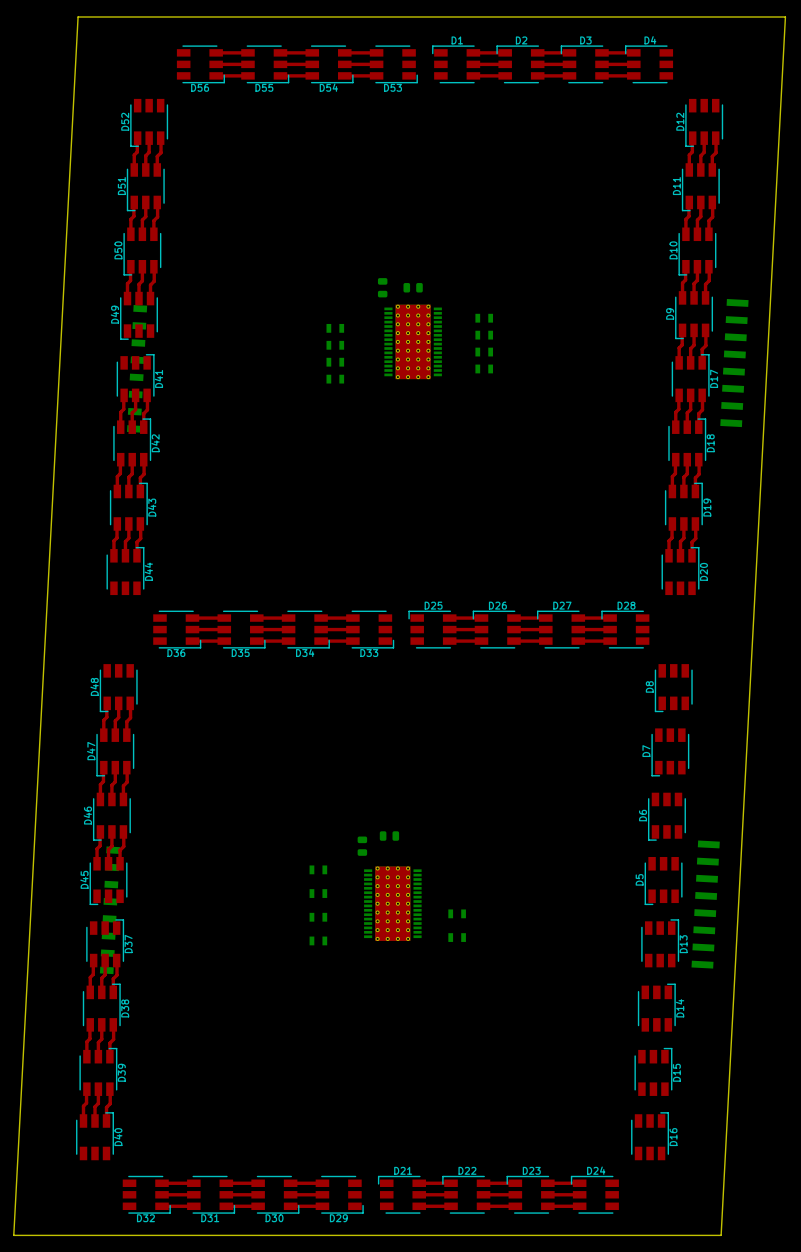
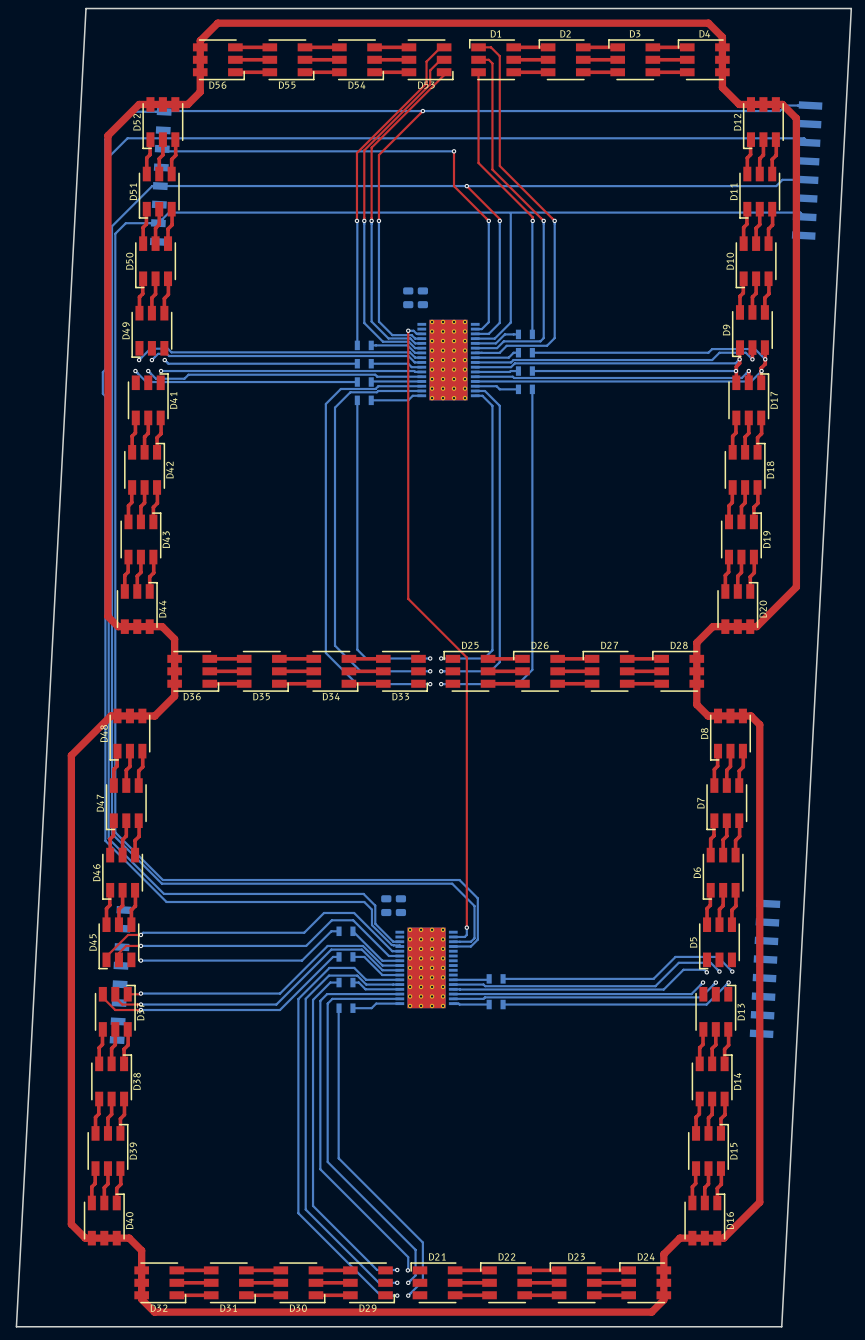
top track: none -> (217, 23) (708, 23) (722, 37) (722, 87) (739, 104) (782, 104) (796, 118) (796, 587) (756, 626) (712, 626) (696, 642) (696, 704) (708, 715) (750, 715) (759, 724) (759, 1202) (723, 1238) (679, 1238) (663, 1254) (663, 1300) (651, 1312) (154, 1312) (141, 1299) (141, 1250) (129, 1238) (85, 1238) (71, 1224) (71, 755) (110, 715) (154, 715) (174, 696) (174, 639) (162, 626) (118, 626) (107, 616) (107, 135) (139, 104) (187, 104) (200, 92) (200, 40) (217, 23)
top track: none -> (444, 47) (440, 47) (426, 61) (426, 83) (356, 153) (356, 220)
top track: none -> (478, 47) (490, 47) (499, 56) (499, 165) (554, 220)
top track: none -> (444, 59) (440, 59) (430, 70) (430, 84) (364, 150) (364, 220)
top track: none -> (478, 59) (488, 59) (492, 63) (492, 169) (543, 220)
top track: none -> (444, 72) (444, 75) (371, 147) (371, 220)
top track: none -> (478, 72) (478, 163) (532, 217) (532, 220)
bottom track: none -> (810, 105) (785, 105) (779, 111) (132, 111) (105, 139) (105, 369) (102, 372) (102, 393) (105, 396) (105, 840) (166, 901) (364, 901) (371, 909) (371, 925) (391, 945) (399, 946)
top track: none -> (422, 111) (378, 154) (378, 220)
via: none -> (422, 111)
bottom track: none -> (808, 142) (804, 138) (127, 138) (108, 157) (108, 838) (163, 893) (363, 893) (375, 905) (375, 923) (393, 941) (399, 941)
bottom track: none -> (162, 148) (164, 151) (454, 151)
top track: none -> (454, 151) (454, 186) (488, 220)
via: none -> (454, 151)
part: none -> (807, 170)
part: none -> (160, 176)
bottom track: none -> (806, 179) (782, 179) (776, 186) (466, 186)
top track: none -> (466, 186) (499, 220)
bottom track: none -> (466, 186) (152, 186) (112, 226) (112, 833) (161, 883) (452, 883) (474, 906) (474, 938) (471, 941) (453, 941)
via: none -> (466, 186)
bottom track: none -> (510, 213) (510, 322) (494, 338) (475, 338)
bottom track: none -> (804, 216) (800, 212) (168, 212) (158, 223) (125, 223) (115, 233) (115, 832) (162, 880) (459, 880) (477, 898) (477, 939) (470, 946) (453, 946)
bottom track: none -> (356, 220) (357, 345)
via: none -> (356, 220)
bottom track: none -> (364, 220) (364, 323) (383, 341) (408, 341) (415, 348) (421, 348)
via: none -> (364, 220)
bottom track: none -> (371, 220) (371, 321) (388, 338) (410, 338) (415, 343) (421, 343)
via: none -> (371, 220)
bottom track: none -> (378, 220) (378, 321) (392, 335) (411, 335) (415, 338) (421, 338)
via: none -> (378, 220)
bottom track: none -> (488, 220) (488, 322) (481, 329) (475, 329)
via: none -> (488, 220)
bottom track: none -> (499, 220) (499, 322) (488, 333) (475, 333)
via: none -> (499, 220)
bottom track: none -> (532, 220) (532, 334)
via: none -> (532, 220)
bottom track: none -> (543, 220) (543, 338) (540, 341) (503, 341) (497, 348) (475, 348)
via: none -> (543, 220)
bottom track: none -> (554, 220) (554, 338) (547, 345) (506, 345) (499, 352) (475, 352)
via: none -> (554, 220)
part: none -> (408, 297)
part: none -> (422, 297)
part: (382, 287) -> none
part: (413, 287) -> none
top track: none -> (408, 330) (408, 598) (466, 657) (466, 927)
bottom track: none -> (408, 330) (421, 333)
via: none -> (408, 330)
bottom track: none -> (518, 334) (504, 334) (495, 343) (475, 343)
bottom track: none -> (371, 345) (407, 345) (415, 352) (421, 352)
bottom track: none -> (518, 352) (513, 352) (508, 357) (475, 357)
bottom track: none -> (532, 352) (708, 352) (712, 349) (755, 349) (765, 359)
bottom track: none -> (421, 357) (415, 357) (409, 352) (171, 352) (167, 348) (150, 348) (139, 360)
via: none -> (139, 360)
bottom track: none -> (151, 360) (158, 353) (166, 353) (169, 356) (408, 356) (414, 362) (421, 362)
via: none -> (151, 360)
bottom track: none -> (164, 360) (168, 363) (357, 363)
via: none -> (164, 360)
bottom track: none -> (739, 359) (735, 363) (514, 363) (511, 367) (475, 367)
via: none -> (739, 359)
top track: (694, 341) (690, 352) -> none
bottom track: none -> (752, 359) (745, 352) (719, 352) (712, 360) (513, 360) (511, 362) (475, 362)
via: none -> (752, 359)
via: none -> (765, 359)
bottom track: none -> (371, 363) (408, 363) (411, 367) (421, 367)
bottom track: none -> (135, 371) (146, 382) (357, 382)
via: none -> (135, 371)
bottom track: none -> (148, 371) (155, 378) (184, 378) (188, 374) (375, 374) (377, 376) (421, 376)
via: none -> (148, 371)
bottom track: none -> (161, 371) (421, 371)
via: none -> (161, 371)
bottom track: none -> (518, 371) (475, 371)
bottom track: none -> (532, 371) (735, 371)
via: none -> (735, 371)
bottom track: none -> (748, 371) (741, 377) (475, 376)
via: none -> (748, 371)
bottom track: none -> (761, 371) (751, 381) (475, 381)
via: none -> (761, 371)
bottom track: none -> (421, 381) (371, 382)
part: (734, 363) -> none
bottom track: none -> (421, 386) (340, 388) (325, 403) (325, 652) (356, 684) (430, 684)
bottom track: none -> (475, 386) (496, 386) (499, 389) (518, 389)
part: (137, 368) -> none
bottom track: none -> (532, 389) (532, 669) (518, 684) (441, 684)
bottom track: none -> (421, 390) (350, 392) (335, 407) (335, 645) (360, 671) (430, 671)
bottom track: none -> (475, 390) (484, 390) (499, 405) (499, 662) (490, 671) (441, 671)
bottom track: none -> (421, 395) (412, 395) (408, 400) (371, 400)
bottom track: none -> (475, 395) (482, 395) (492, 405) (492, 650) (484, 658) (441, 658)
bottom track: none -> (357, 400) (357, 649) (366, 658) (430, 658)
via: none -> (430, 658)
via: none -> (441, 658)
via: none -> (430, 671)
via: none -> (441, 671)
via: none -> (430, 684)
via: none -> (441, 684)
top track: none -> (717, 750) (714, 785)
top track: none -> (730, 750) (730, 766) (726, 770) (726, 785)
top track: none -> (743, 750) (743, 766) (739, 770) (739, 785)
top track: none -> (713, 819) (710, 855)
top track: none -> (726, 819) (726, 836) (723, 839) (723, 855)
top track: none -> (739, 819) (739, 836) (735, 840) (735, 855)
top track: none -> (710, 889) (707, 924)
top track: none -> (723, 889) (723, 905) (719, 909) (719, 924)
top track: none -> (735, 889) (735, 906) (731, 910) (731, 924)
part: (389, 836) -> none
part: none -> (386, 905)
part: (362, 846) -> none
part: none -> (400, 905)
bottom track: none -> (466, 927) (466, 934) (464, 936) (453, 936)
via: none -> (466, 927)
bottom track: none -> (339, 931) (331, 931) (302, 960) (140, 960)
bottom track: none -> (352, 931) (382, 960) (399, 960)
top track: none -> (140, 934) (128, 934) (106, 956) (106, 959)
bottom track: none -> (140, 934) (143, 932) (304, 932) (324, 912) (354, 912) (392, 951) (399, 951)
via: none -> (140, 934)
top track: none -> (140, 945) (126, 945) (118, 953) (118, 959)
bottom track: none -> (140, 945) (306, 945) (331, 920) (353, 920) (388, 956) (399, 956)
via: none -> (140, 945)
bottom track: none -> (339, 956) (333, 956) (279, 1010) (140, 1010)
bottom track: none -> (352, 956) (364, 956) (382, 975) (399, 975)
via: none -> (140, 960)
bottom track: none -> (399, 965) (382, 965) (362, 945) (327, 945) (280, 993) (140, 993)
bottom track: none -> (399, 970) (382, 970) (361, 949) (331, 949) (276, 1004) (140, 1004)
bottom track: none -> (706, 972) (704, 969) (683, 969) (663, 989) (453, 989)
via: none -> (706, 972)
bottom track: none -> (719, 971) (710, 962) (678, 962) (655, 986) (453, 984)
via: none -> (719, 971)
bottom track: none -> (732, 971) (717, 956) (675, 956) (653, 978) (503, 978)
via: none -> (732, 971)
bottom track: none -> (489, 978) (453, 979)
bottom track: none -> (399, 979) (366, 979) (354, 967) (329, 967) (298, 999) (298, 1213) (380, 1295) (397, 1295)
bottom track: none -> (339, 982) (330, 982) (313, 999) (313, 1205) (377, 1270) (397, 1270)
bottom track: none -> (352, 982) (358, 982) (365, 989) (399, 989)
bottom track: none -> (703, 982) (691, 994) (453, 994)
via: none -> (703, 982)
bottom track: none -> (715, 982) (700, 997) (453, 998)
via: none -> (715, 982)
bottom track: none -> (728, 982) (706, 1004) (503, 1004)
via: none -> (728, 982)
bottom track: none -> (399, 984) (366, 984) (357, 975) (328, 975) (305, 998) (305, 1209) (378, 1282) (397, 1282)
top track: none -> (140, 993) (127, 994)
via: none -> (140, 993)
bottom track: none -> (399, 994) (327, 994) (320, 1000) (320, 1169) (408, 1257) (407, 1270)
top track: none -> (102, 994) (102, 997) (115, 1010) (140, 1010)
top track: none -> (115, 994) (115, 997) (122, 1004) (140, 1004)
bottom track: none -> (399, 998) (332, 998) (327, 1003) (327, 1161) (415, 1249) (415, 1275) (408, 1282)
bottom track: none -> (399, 1003) (376, 1003) (371, 1008) (352, 1008)
bottom track: none -> (453, 1003) (489, 1004)
via: none -> (140, 1004)
bottom track: none -> (339, 1008) (338, 1158) (422, 1242) (422, 1280) (408, 1295)
via: none -> (140, 1010)
top track: none -> (703, 1028) (699, 1063)
top track: none -> (715, 1028) (715, 1044) (712, 1048) (712, 1063)
top track: none -> (728, 1028) (728, 1045) (724, 1049) (724, 1063)
top track: none -> (699, 1097) (696, 1133)
top track: none -> (712, 1097) (712, 1114) (708, 1118) (708, 1133)
top track: none -> (724, 1097) (724, 1114) (720, 1118) (720, 1133)
top track: none -> (695, 1167) (692, 1202)
top track: none -> (708, 1167) (708, 1183) (704, 1187) (704, 1202)
top track: none -> (721, 1167) (721, 1184) (717, 1188) (717, 1202)
via: none -> (397, 1270)
via: none -> (407, 1270)
via: none -> (397, 1282)
via: none -> (408, 1282)
via: none -> (397, 1295)
via: none -> (408, 1295)

